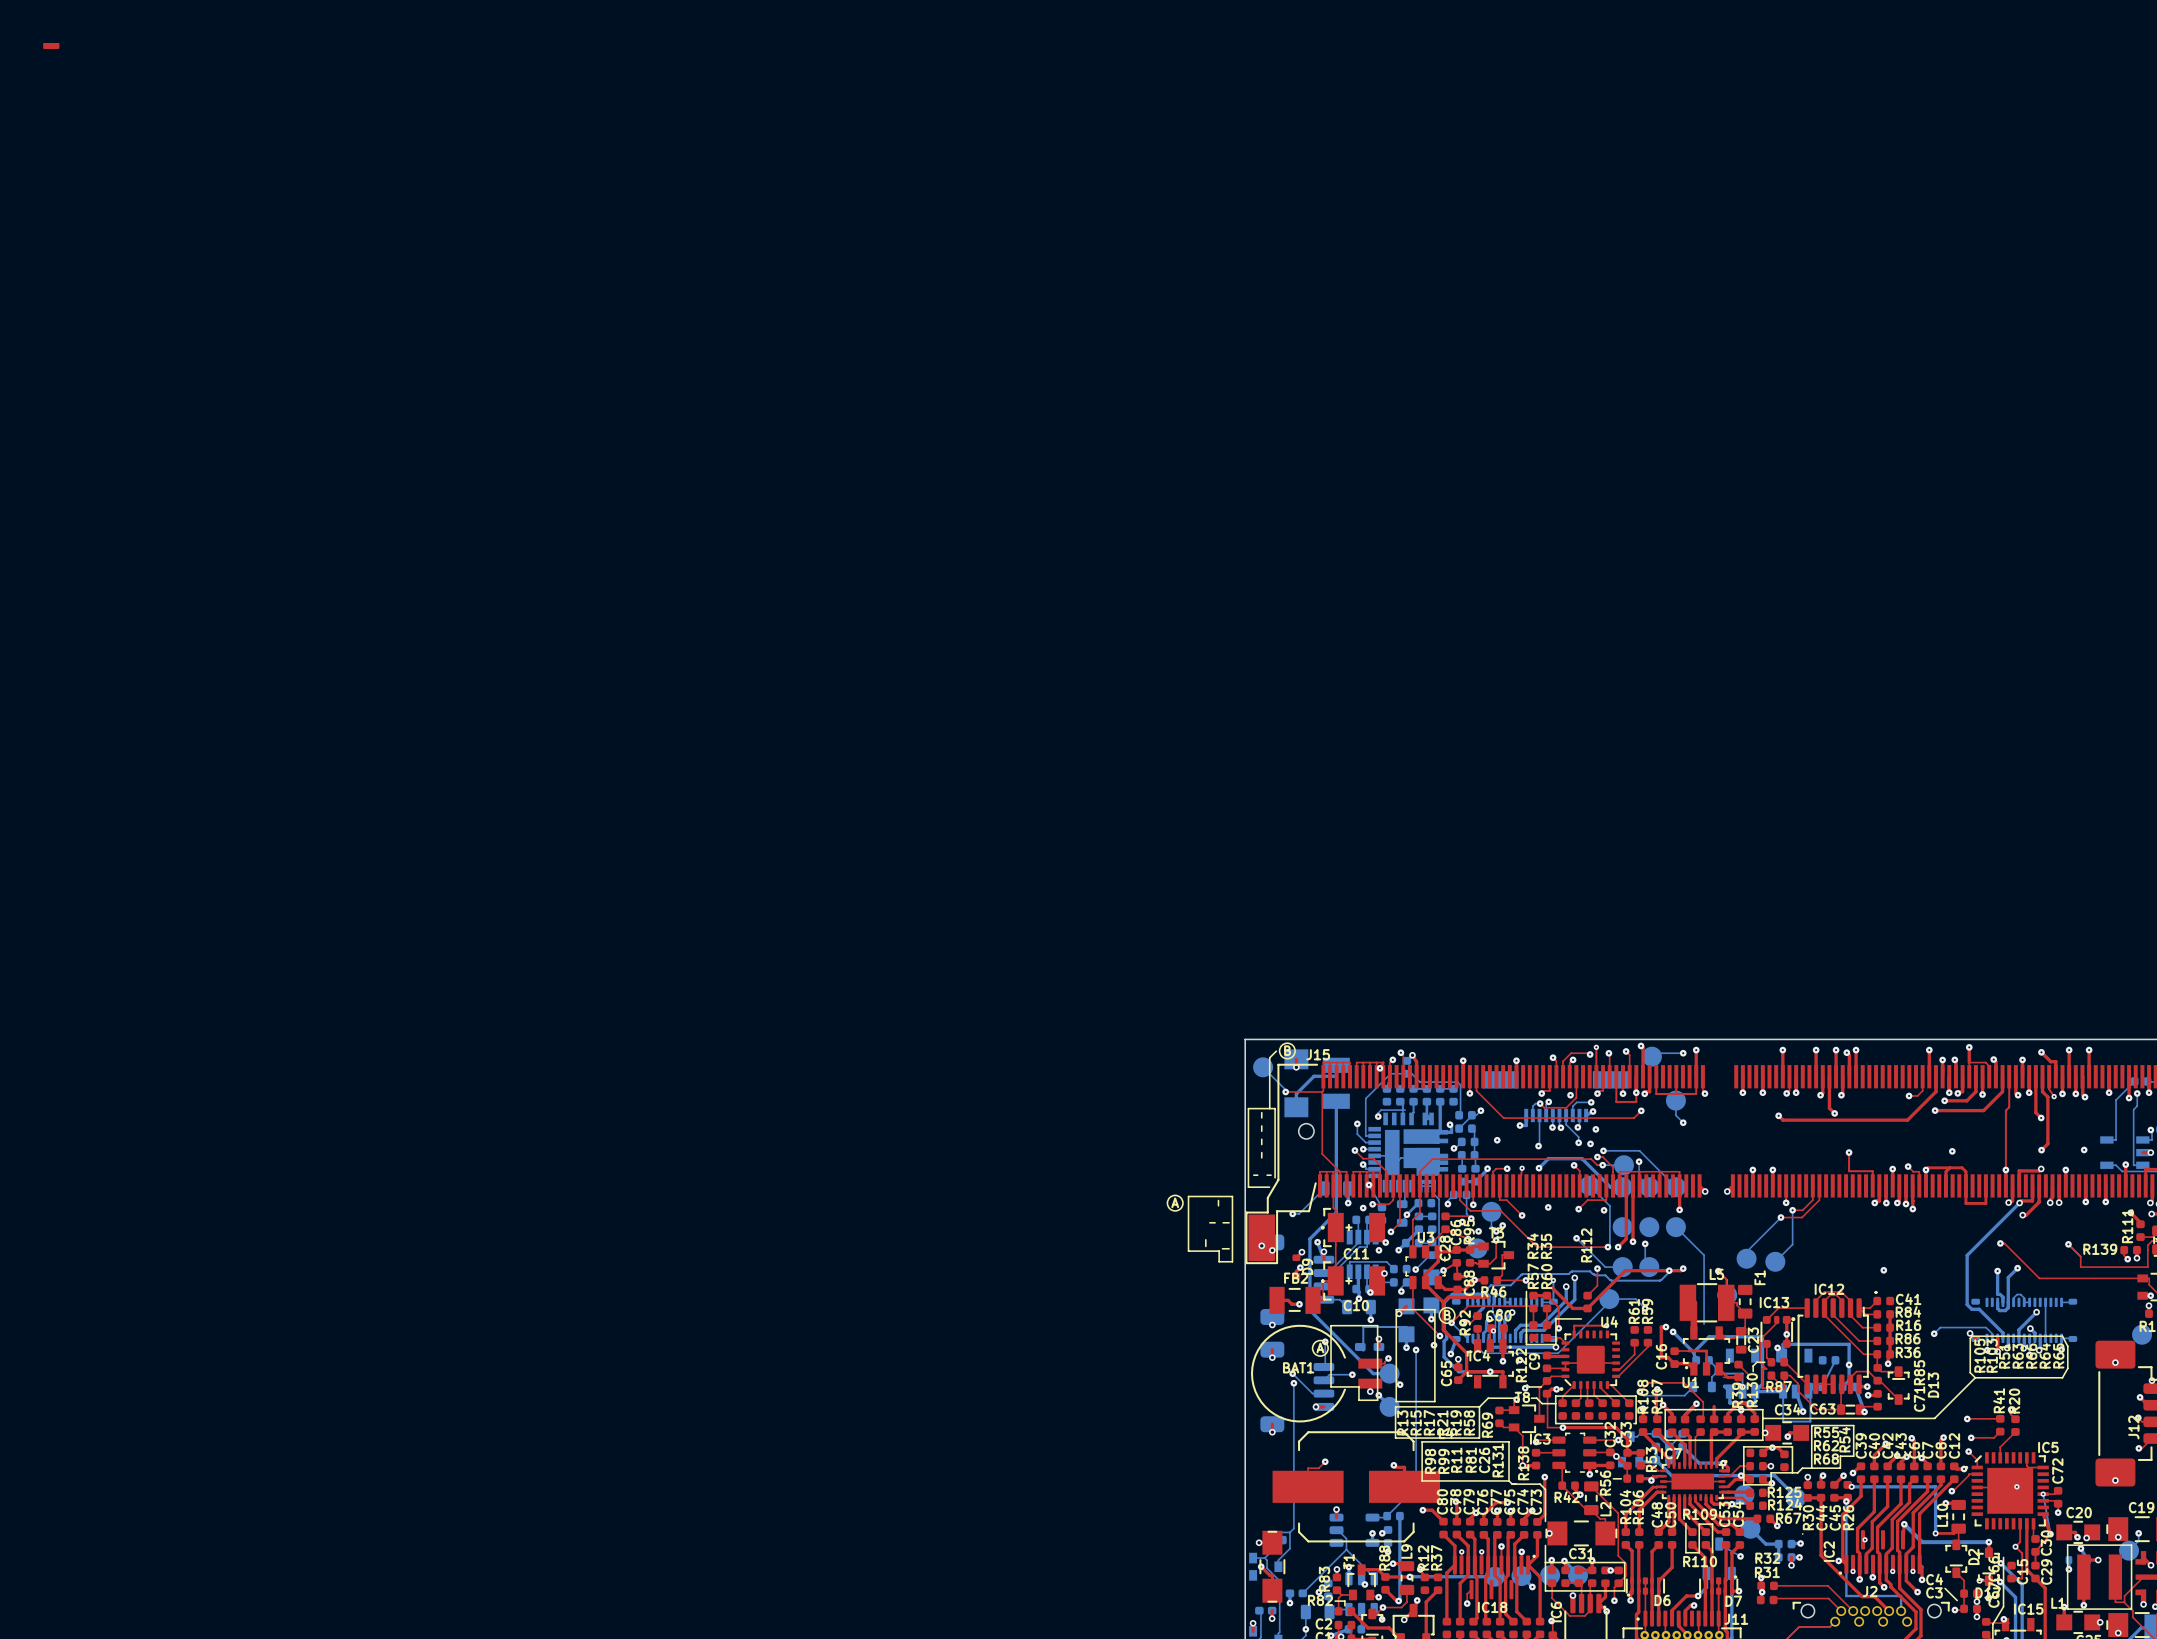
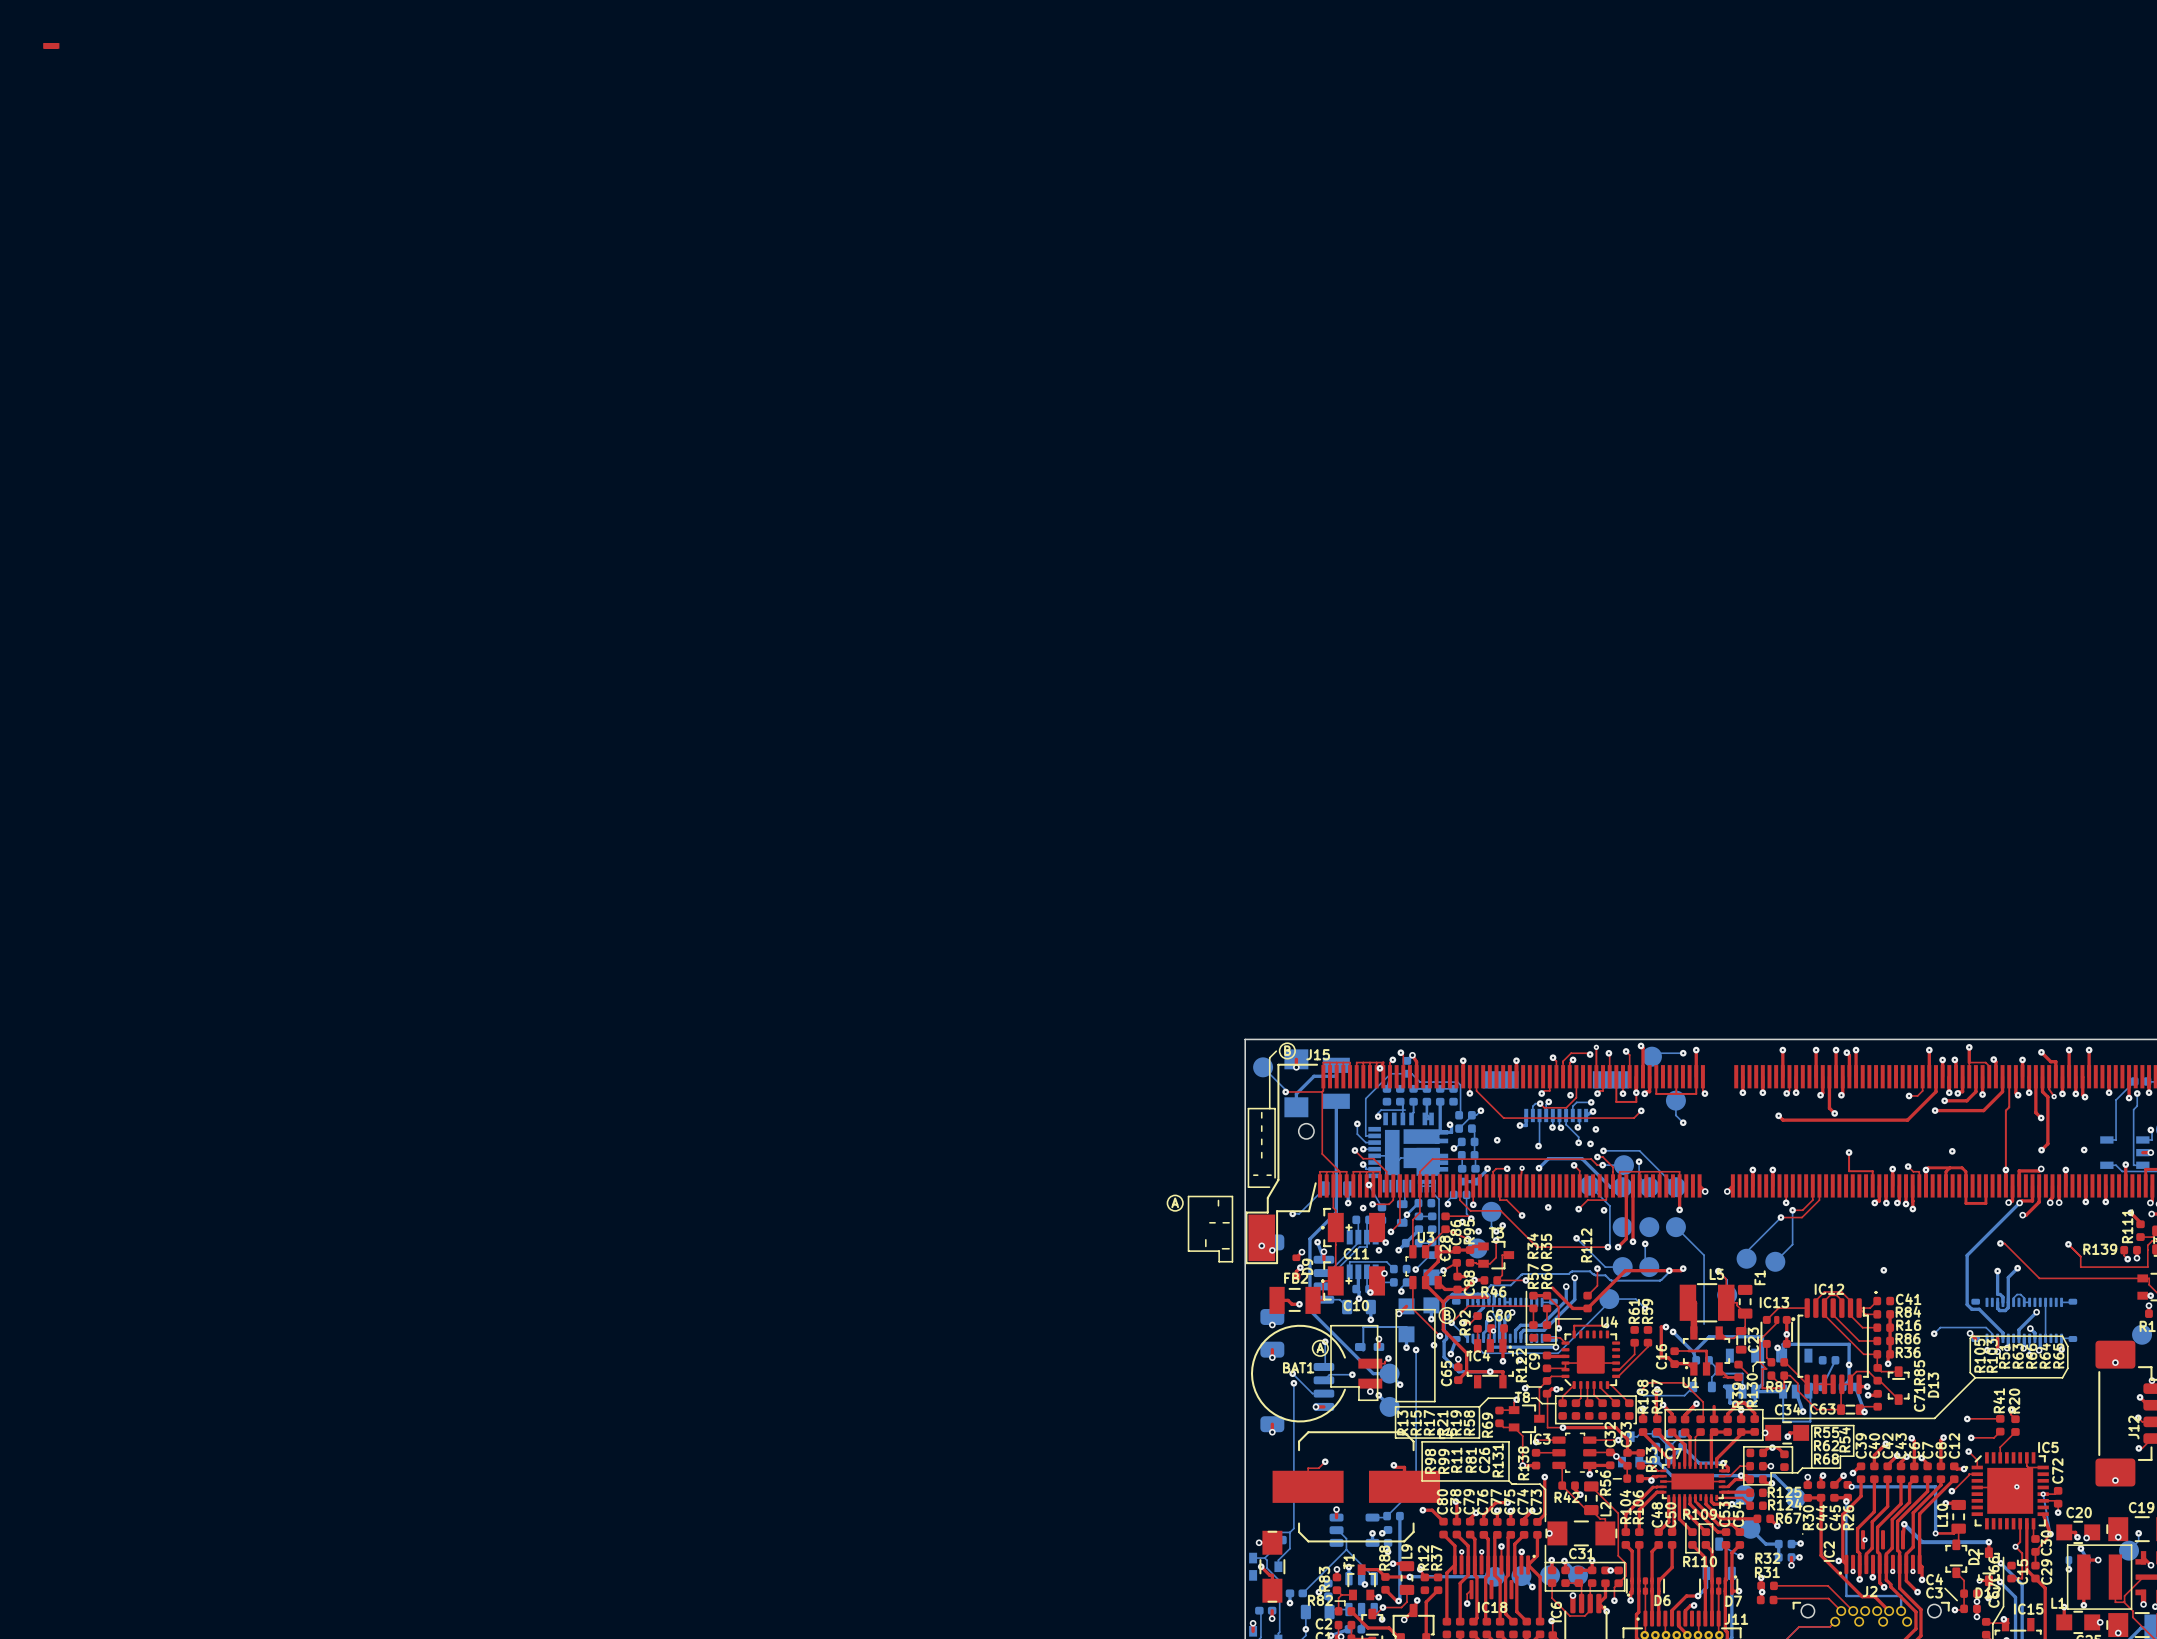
bottom track: (1553, 1280) (1553, 1301) -> none
via: (1553, 1280) -> none

